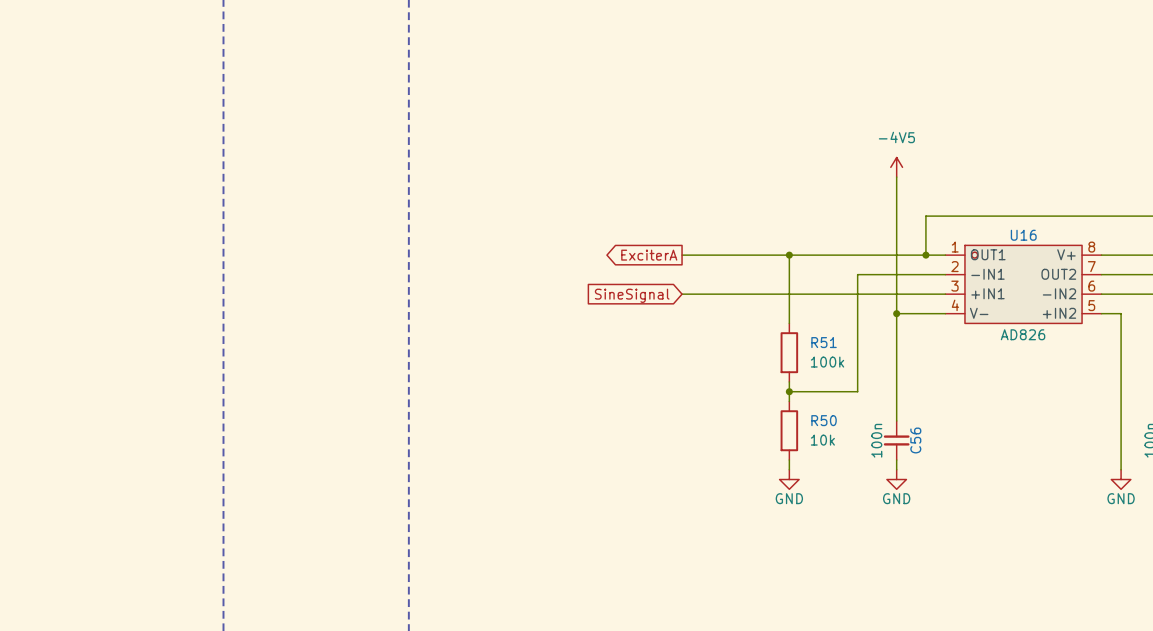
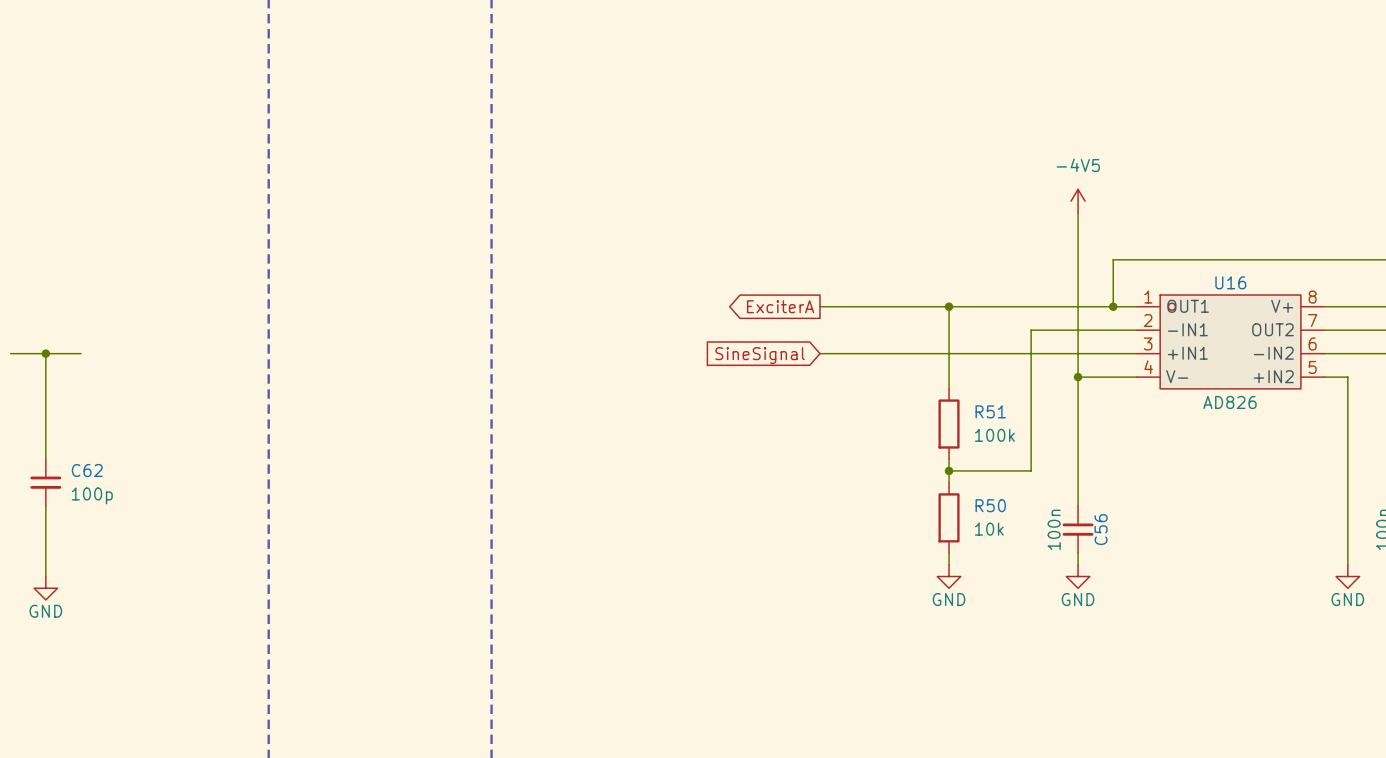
wire: none -> (10, 353) (81, 353)
wire: none -> (45, 353) (45, 459)
junction: none -> (45, 353)
C62: none -> 100p (45, 482)
wire: none -> (45, 506) (45, 576)
power symbol: none -> GND (45, 588)

